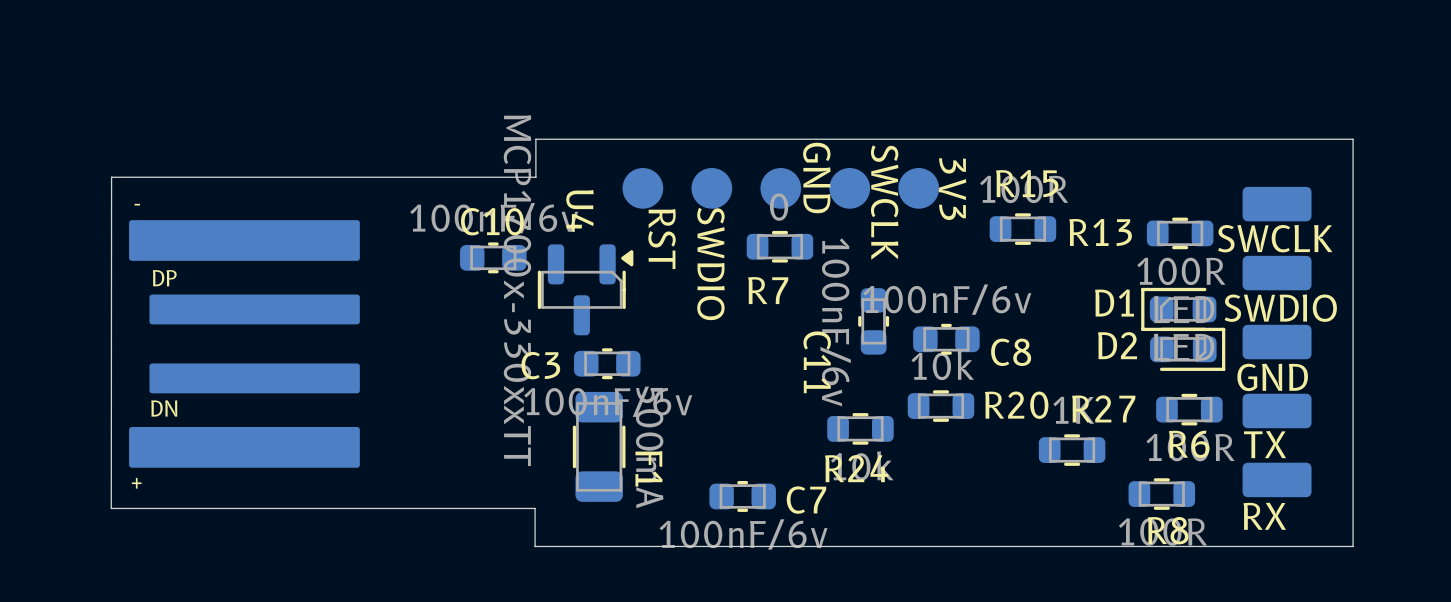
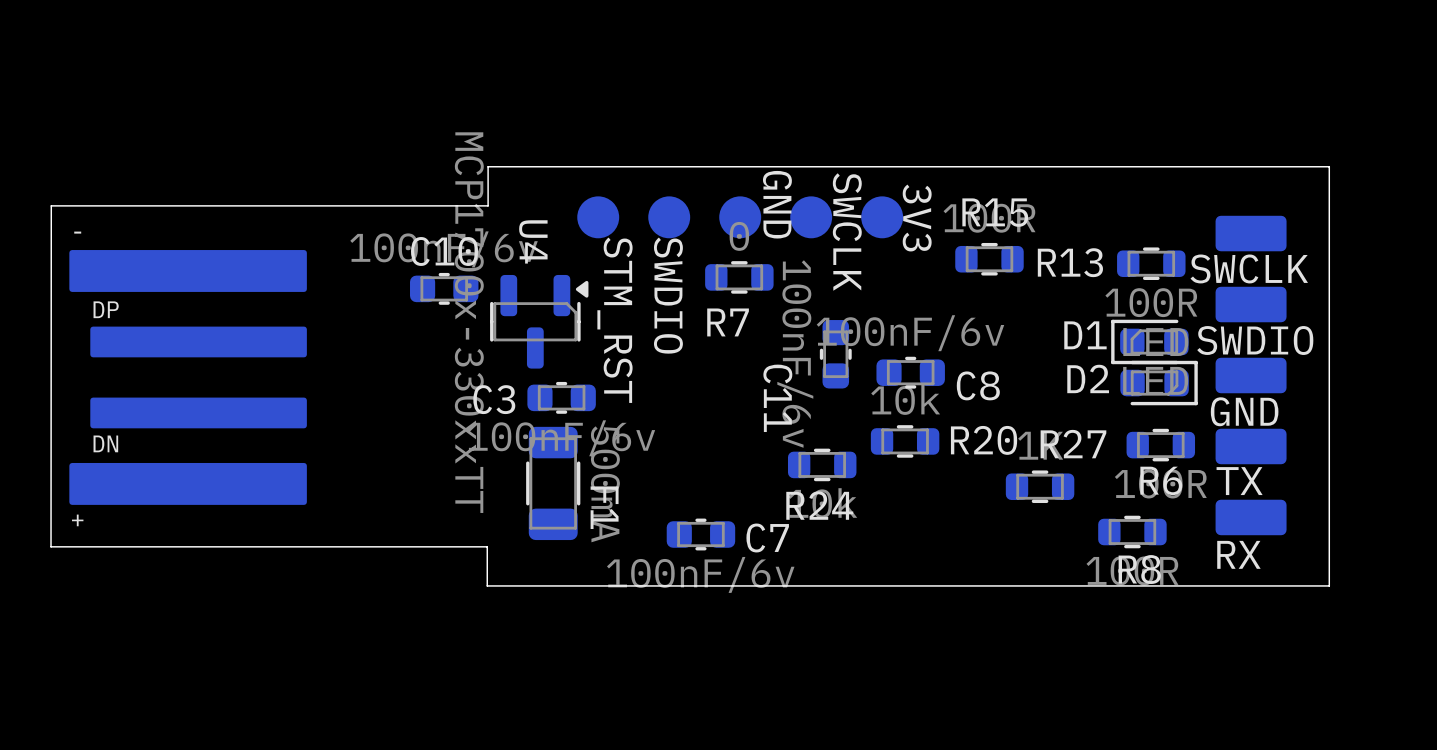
text: RST (662, 239) -> STM_RST (614, 320)

